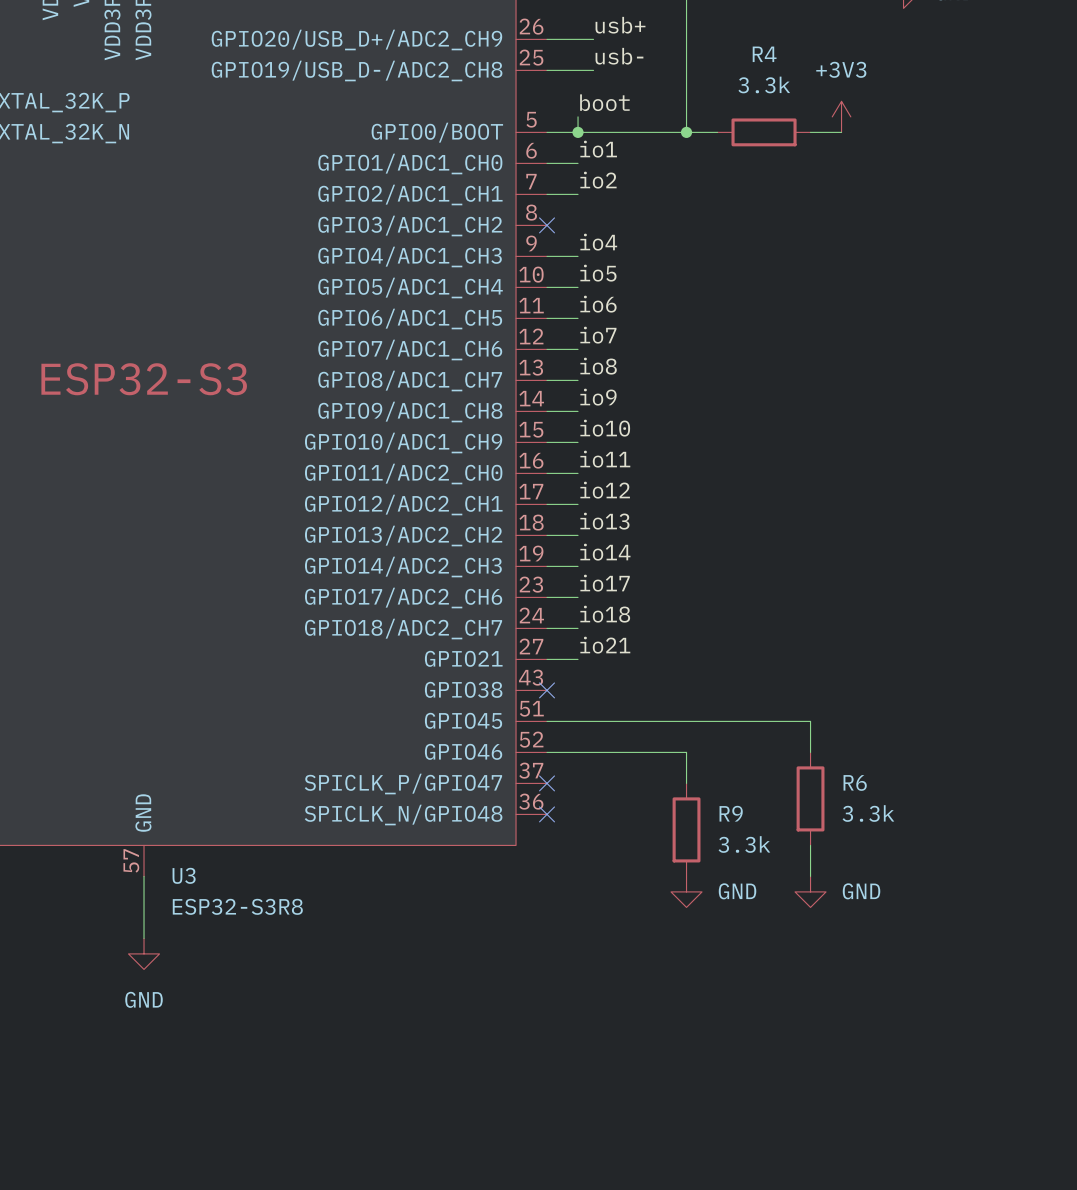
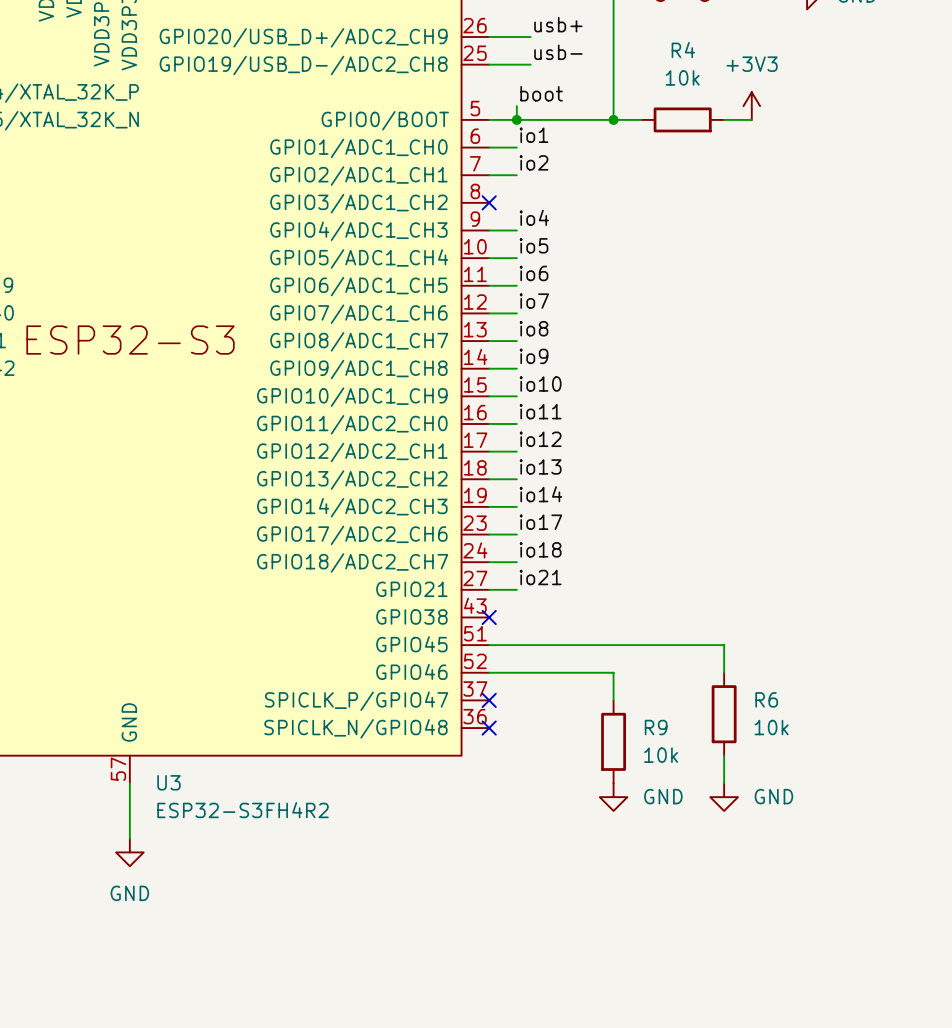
R4 value: 3.3k (764, 84) -> 10k (682, 77)
R6 value: 3.3k (868, 813) -> 10k (771, 727)
R9 value: 3.3k (744, 844) -> 10k (661, 755)
U3 value: ESP32-S3R8 (237, 906) -> ESP32-S3FH4R2 (243, 810)

